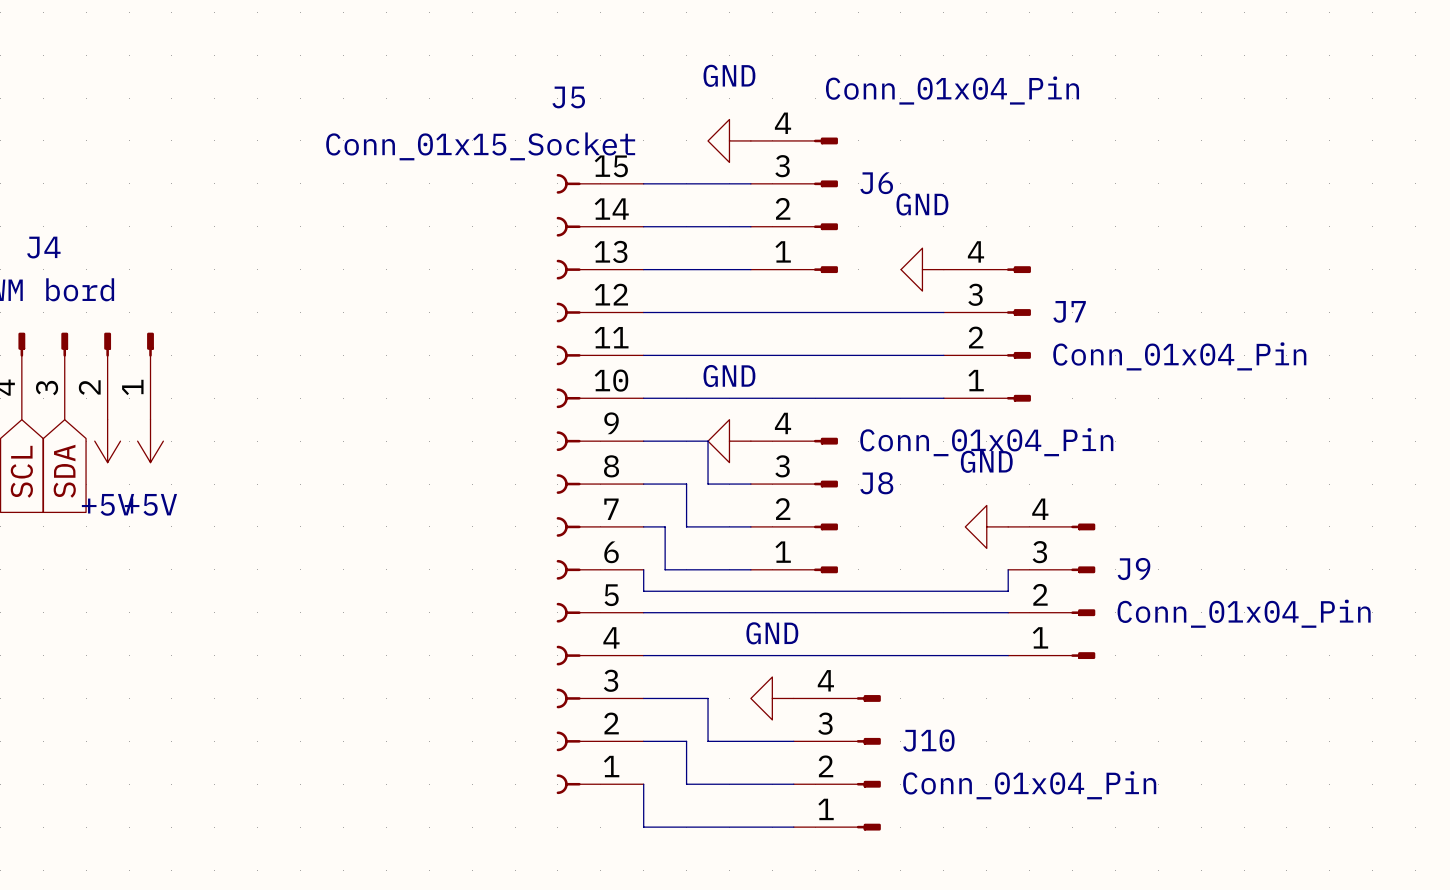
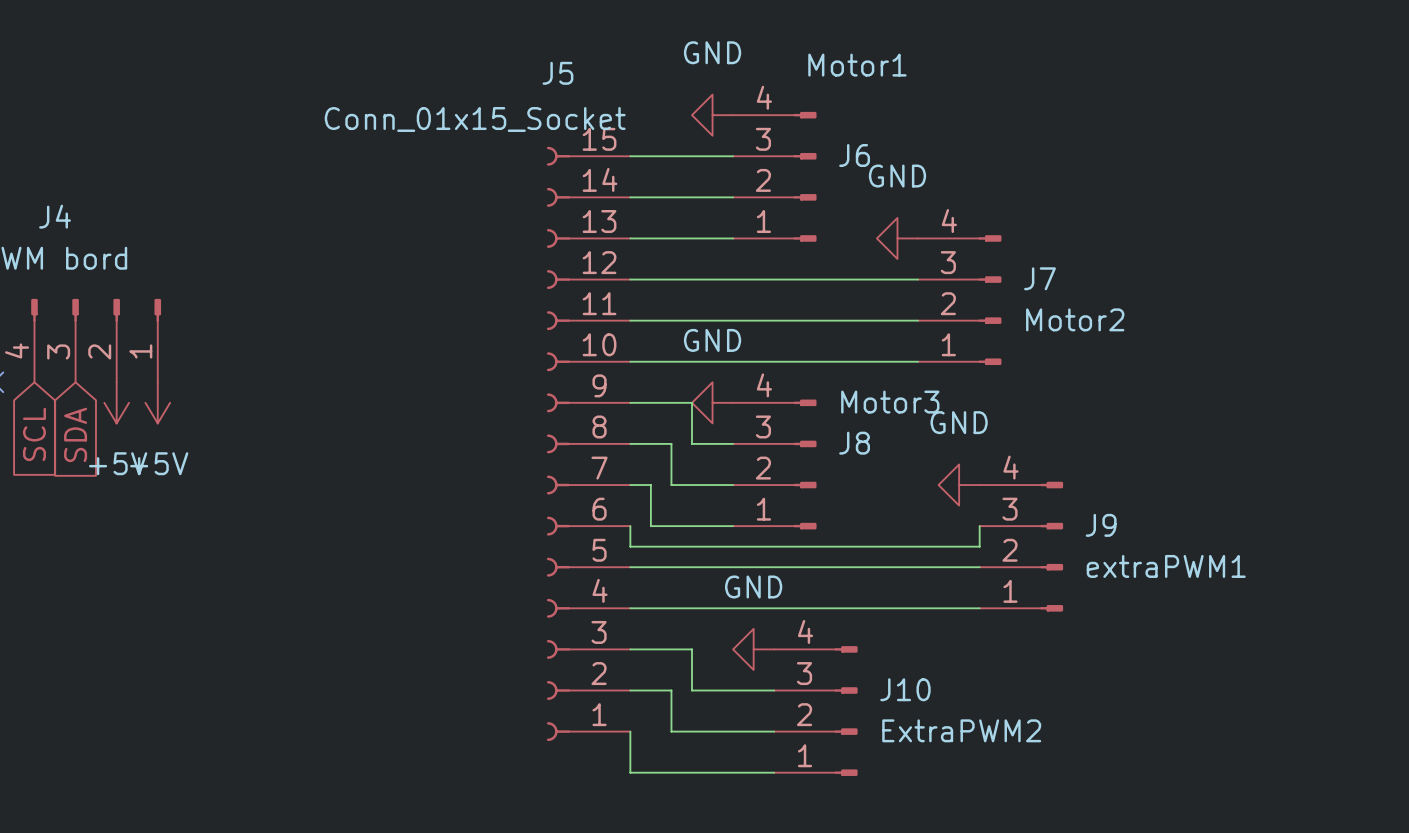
J6 value: Conn_01x04_Pin (952, 90) -> Motor1 (857, 65)
J7 value: Conn_01x04_Pin (1179, 356) -> Motor2 (1075, 319)
J8 value: Conn_01x04_Pin (986, 442) -> Motor3 (890, 402)
J9 value: Conn_01x04_Pin (1244, 613) -> extraPWM1 (1166, 566)
J10 value: Conn_01x04_Pin (1029, 785) -> ExtraPWM2 (961, 730)

